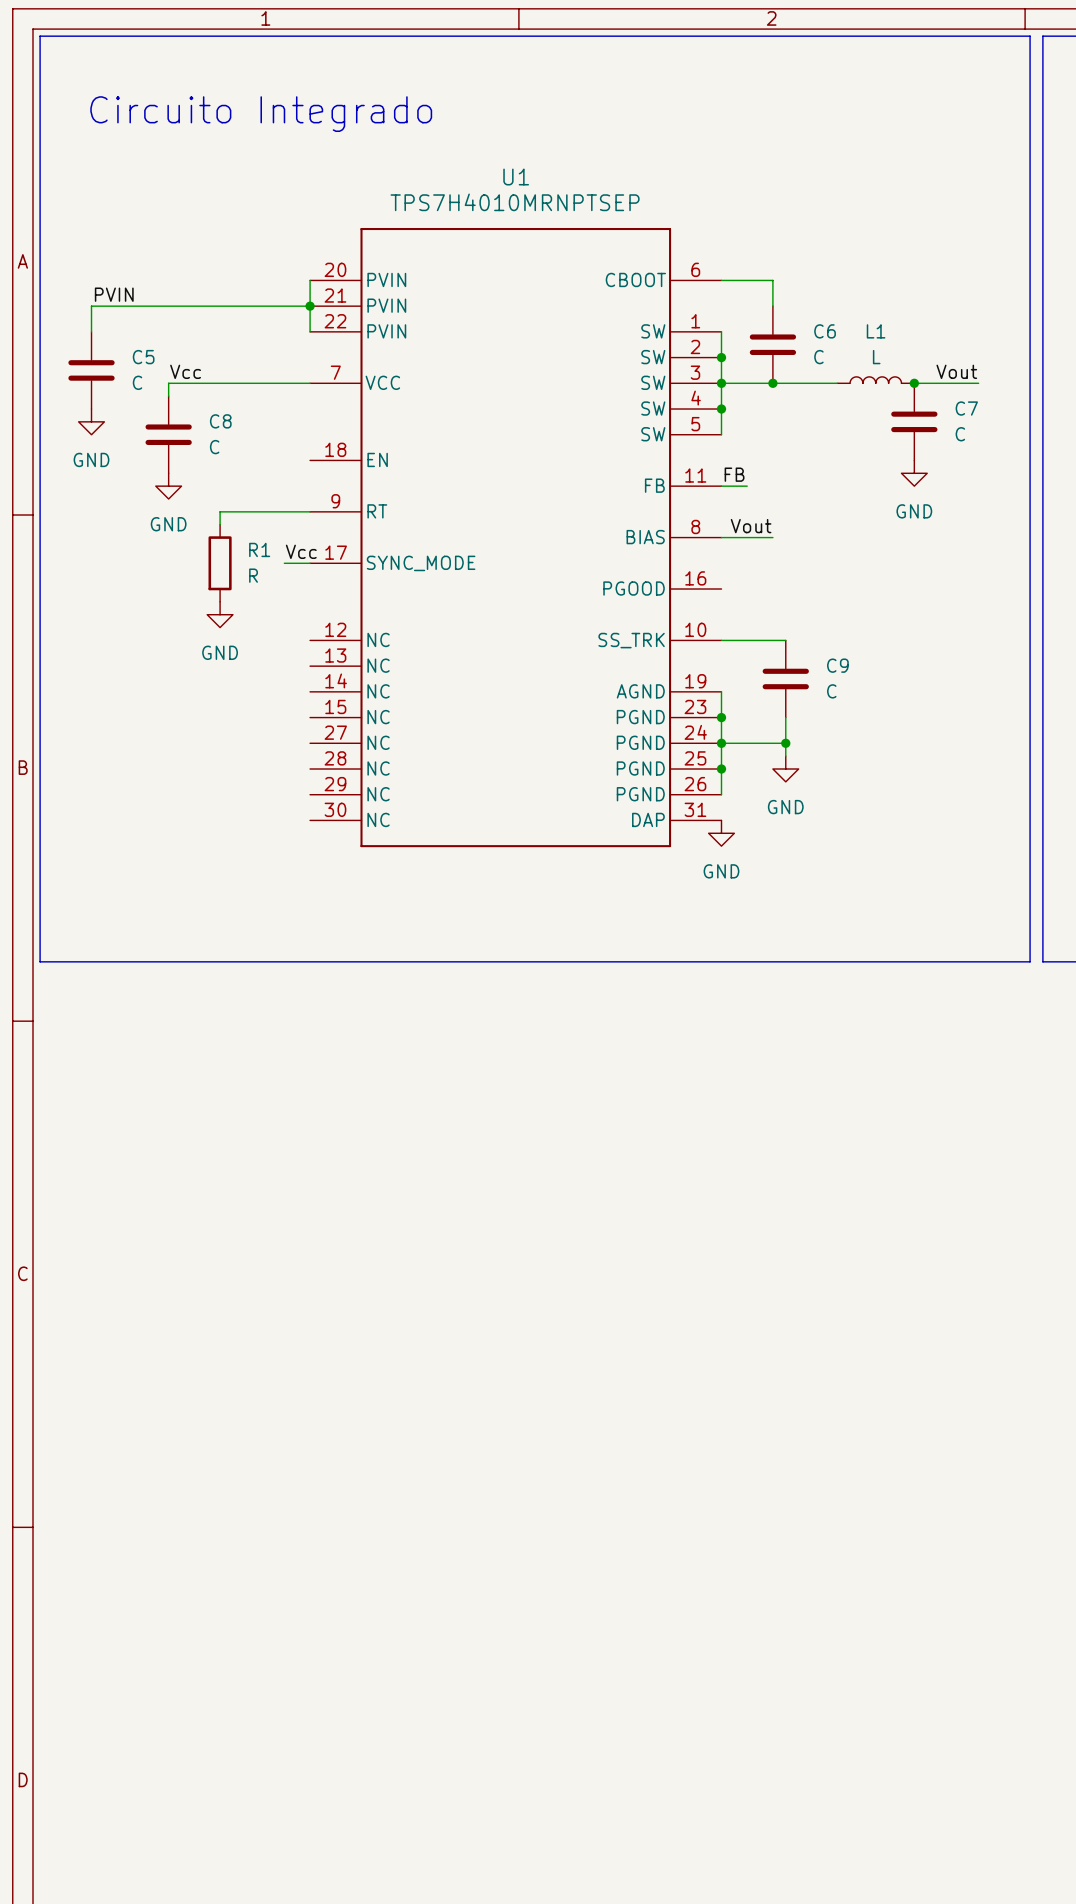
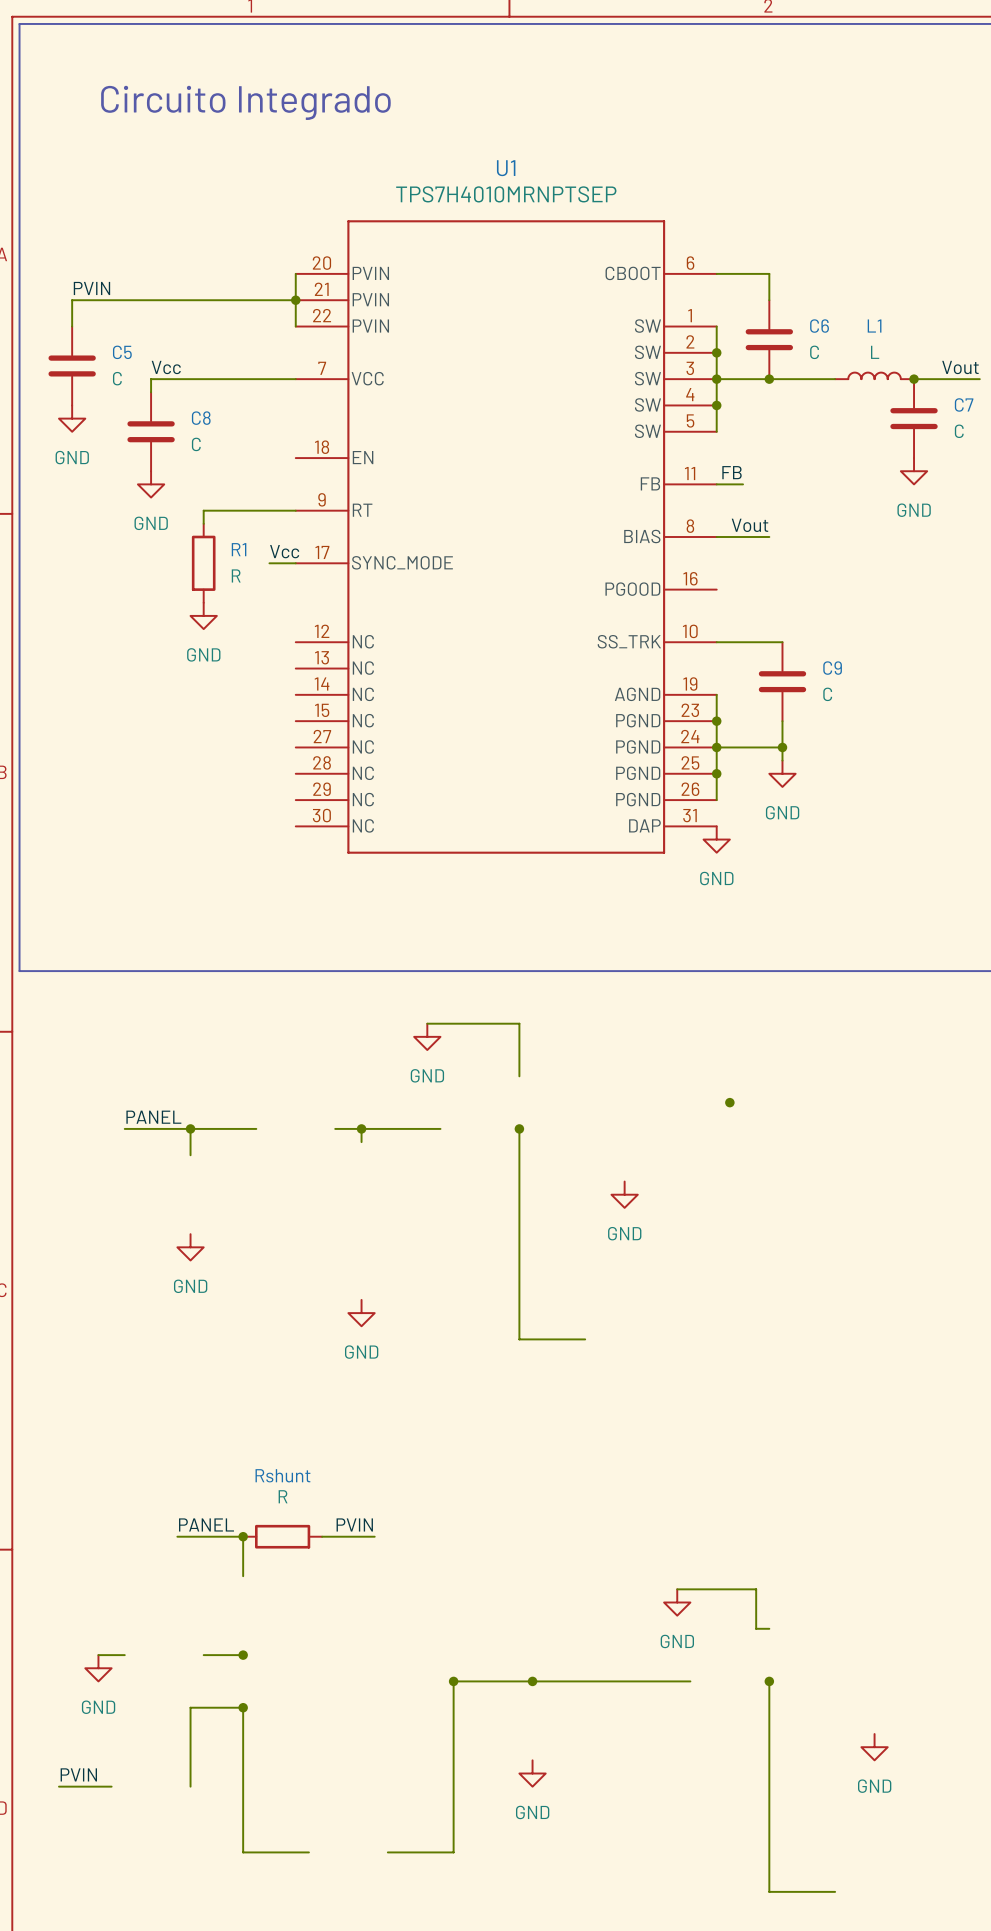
wire: none -> (427, 1023) (519, 1023) (519, 1076)
power symbol: none -> GND (427, 1036)
junction: none -> (729, 1102)
label: none -> PANEL (153, 1117)
wire: none -> (124, 1128) (256, 1128)
wire: none -> (190, 1128) (190, 1155)
junction: none -> (190, 1128)
wire: none -> (335, 1128) (440, 1128)
wire: none -> (361, 1128) (361, 1142)
junction: none -> (361, 1128)
wire: none -> (519, 1128) (519, 1339) (585, 1339)
junction: none -> (519, 1128)
power symbol: none -> GND (624, 1194)
power symbol: none -> GND (190, 1247)
power symbol: none -> GND (361, 1313)
label: none -> PANEL (206, 1524)
label: none -> PVIN (354, 1524)
wire: none -> (177, 1536) (243, 1536) (243, 1576)
junction: none -> (243, 1536)
Rshunt: none -> R (282, 1536)
wire: none -> (322, 1536) (374, 1536)
wire: none -> (677, 1589) (756, 1589) (756, 1628) (769, 1628)
power symbol: none -> GND (677, 1602)
wire: none -> (98, 1655) (124, 1655)
wire: none -> (203, 1655) (243, 1655)
junction: none -> (243, 1655)
power symbol: none -> GND (98, 1668)
junction: none -> (453, 1681)
junction: none -> (532, 1681)
wire: none -> (690, 1681) (453, 1681) (453, 1852) (387, 1852)
wire: none -> (769, 1681) (769, 1891) (835, 1891)
junction: none -> (769, 1681)
junction: none -> (243, 1707)
power symbol: none -> GND (874, 1747)
power symbol: none -> GND (532, 1773)
label: none -> PVIN (78, 1774)
wire: none -> (58, 1786) (111, 1786)
wire: none -> (190, 1786) (190, 1707) (243, 1707) (243, 1852) (308, 1852)

